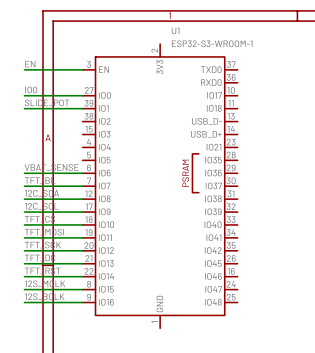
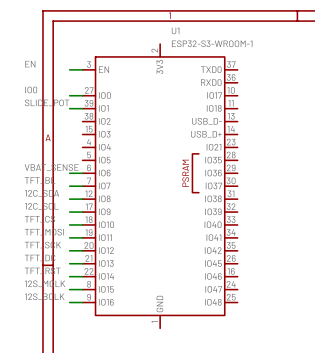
wire: (24, 69) (69, 69) -> none
wire: (24, 95) (69, 95) -> none
wire: (24, 108) (69, 108) -> none
wire: (24, 173) (69, 173) -> none
wire: (24, 186) (69, 186) -> none
wire: (24, 199) (69, 199) -> none
wire: (24, 212) (69, 212) -> none
wire: (24, 224) (69, 224) -> none
wire: (24, 237) (69, 237) -> none
wire: (24, 250) (69, 250) -> none
wire: (24, 263) (69, 263) -> none
wire: (24, 276) (69, 276) -> none
wire: (24, 289) (69, 289) -> none
wire: (24, 302) (69, 302) -> none

